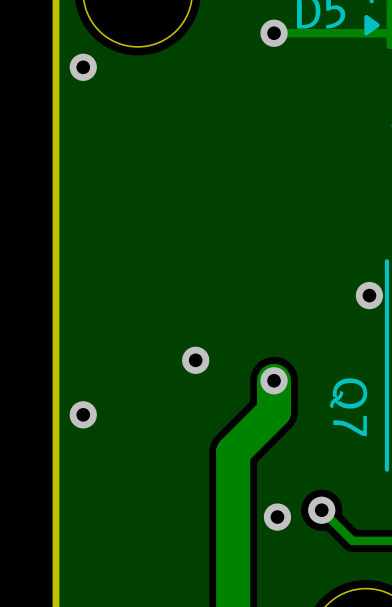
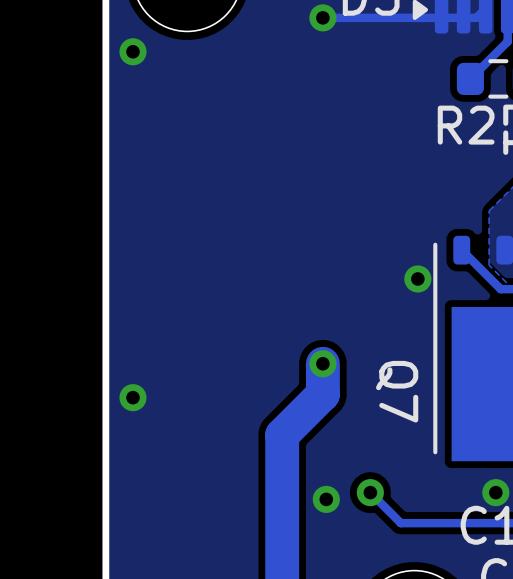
via: (195, 360) -> none

